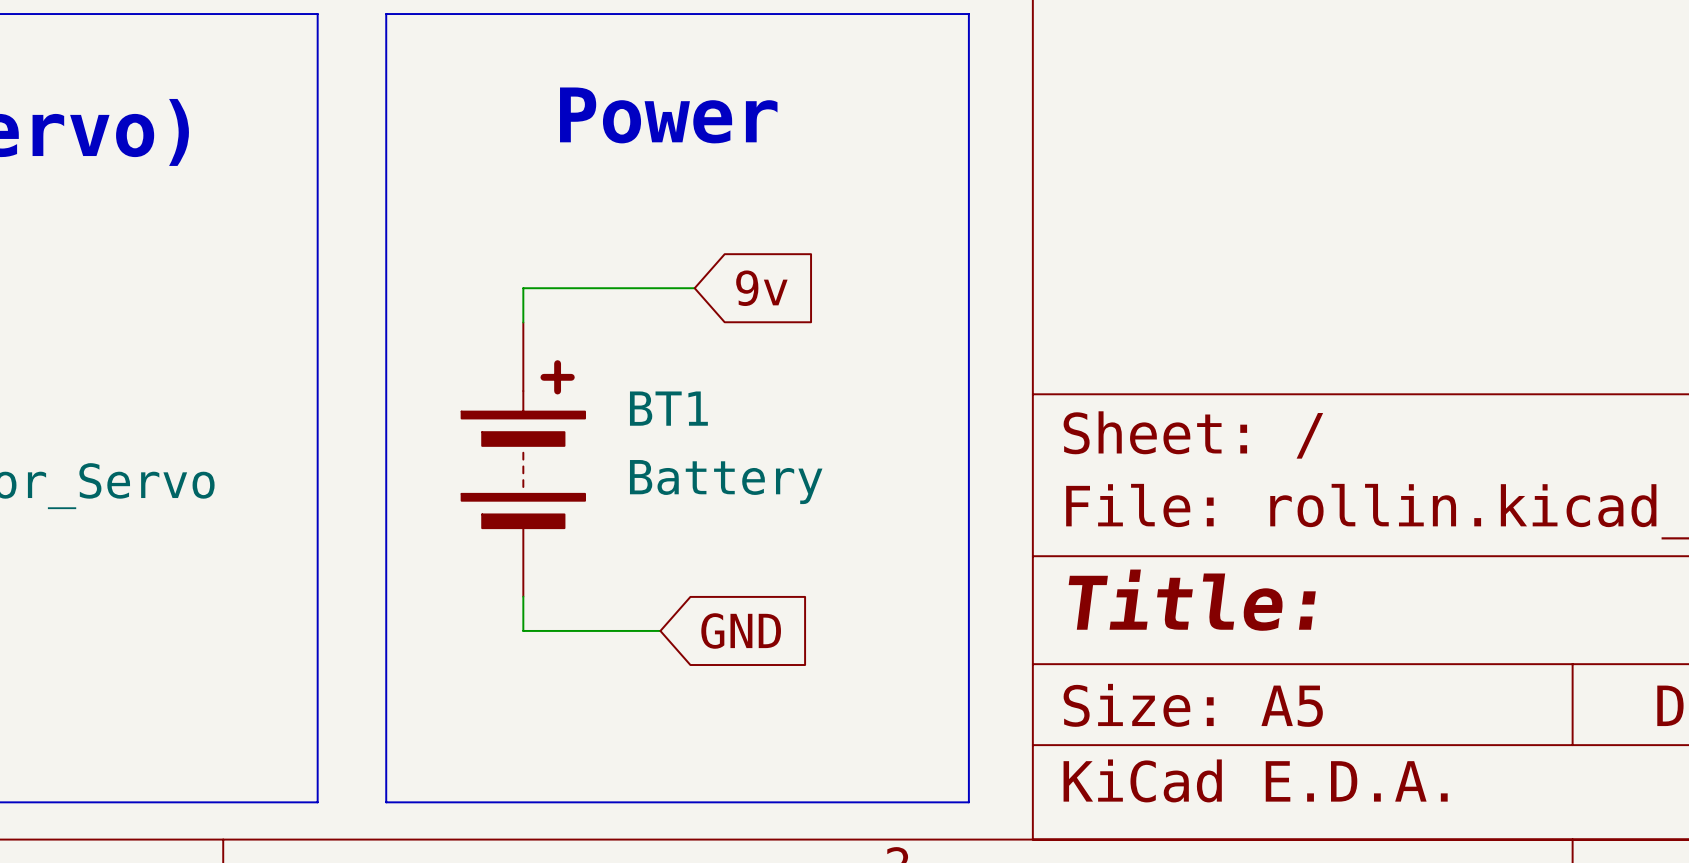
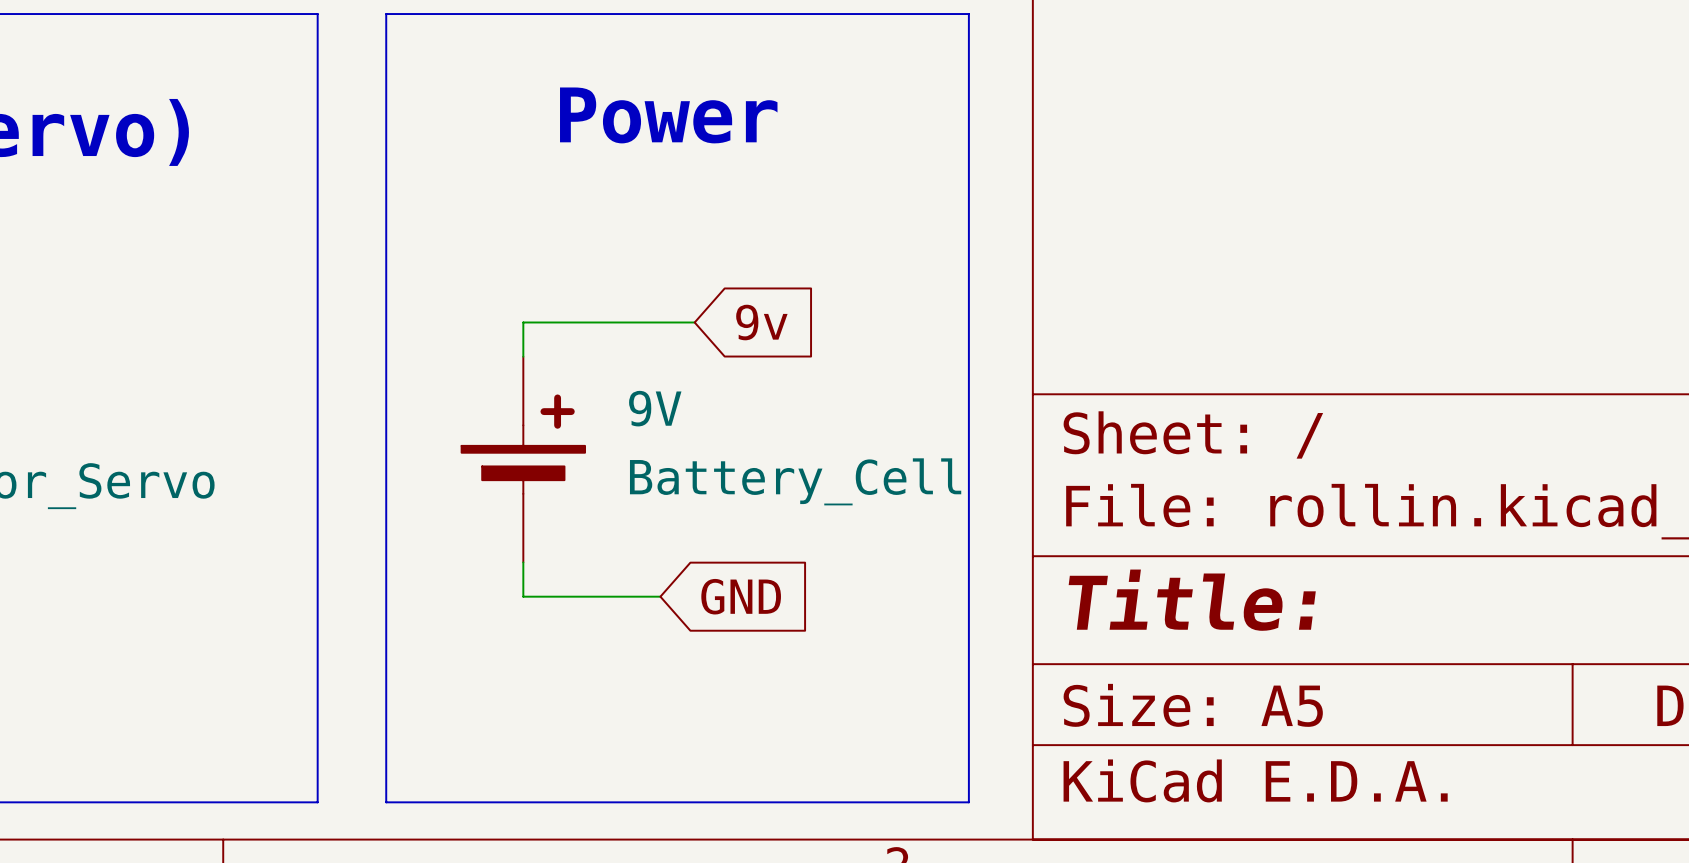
wire: (694, 288) (523, 288) (523, 322) -> (694, 322) (523, 322) (523, 356)
global label position: 9v (761, 288) -> 9v (761, 322)
BT1: Battery (523, 459) -> none
9V: none -> Battery_Cell (523, 459)
wire: (523, 596) (523, 630) (660, 630) -> (523, 562) (523, 596) (660, 596)
global label position: GND (741, 630) -> GND (741, 596)

